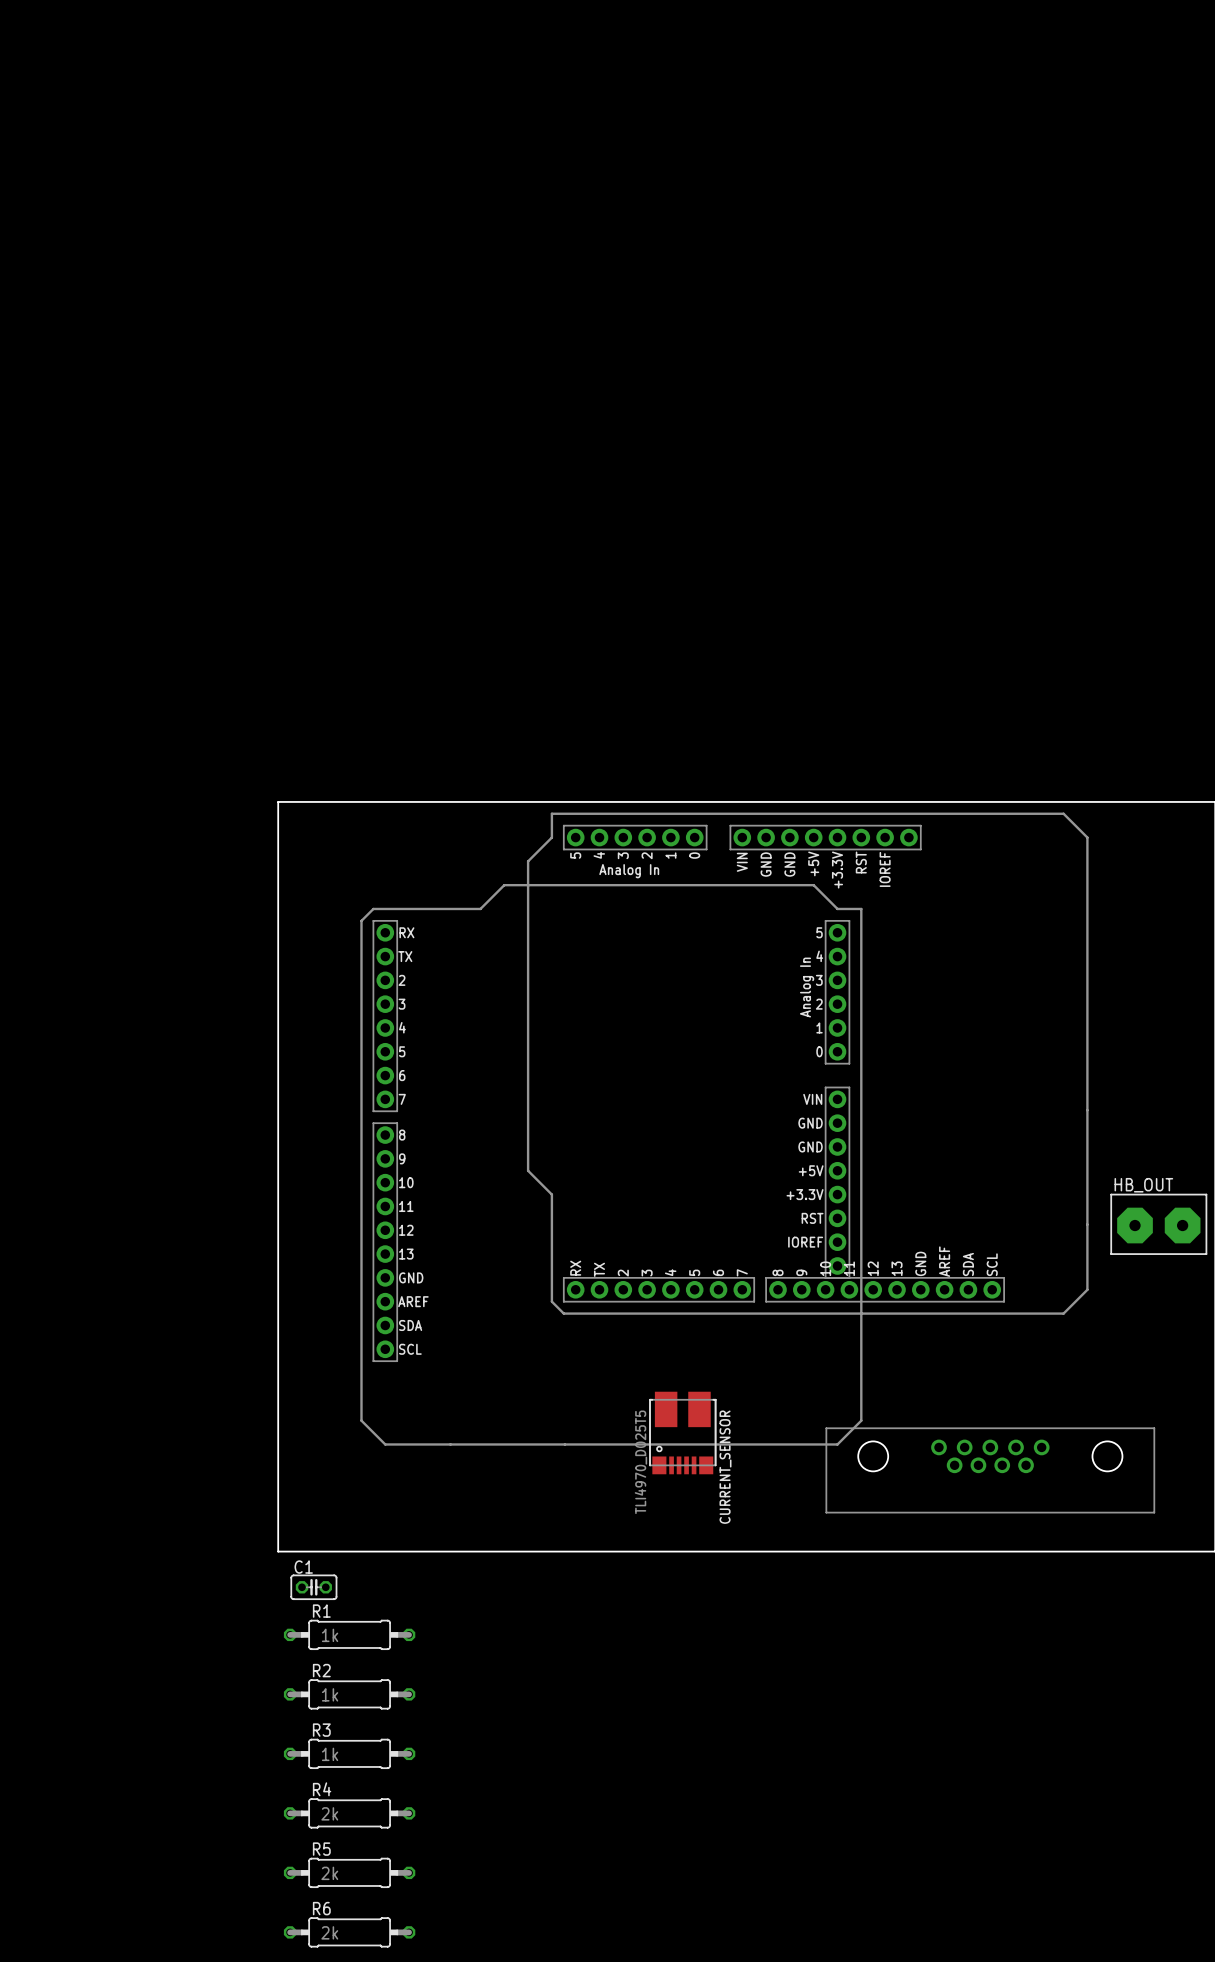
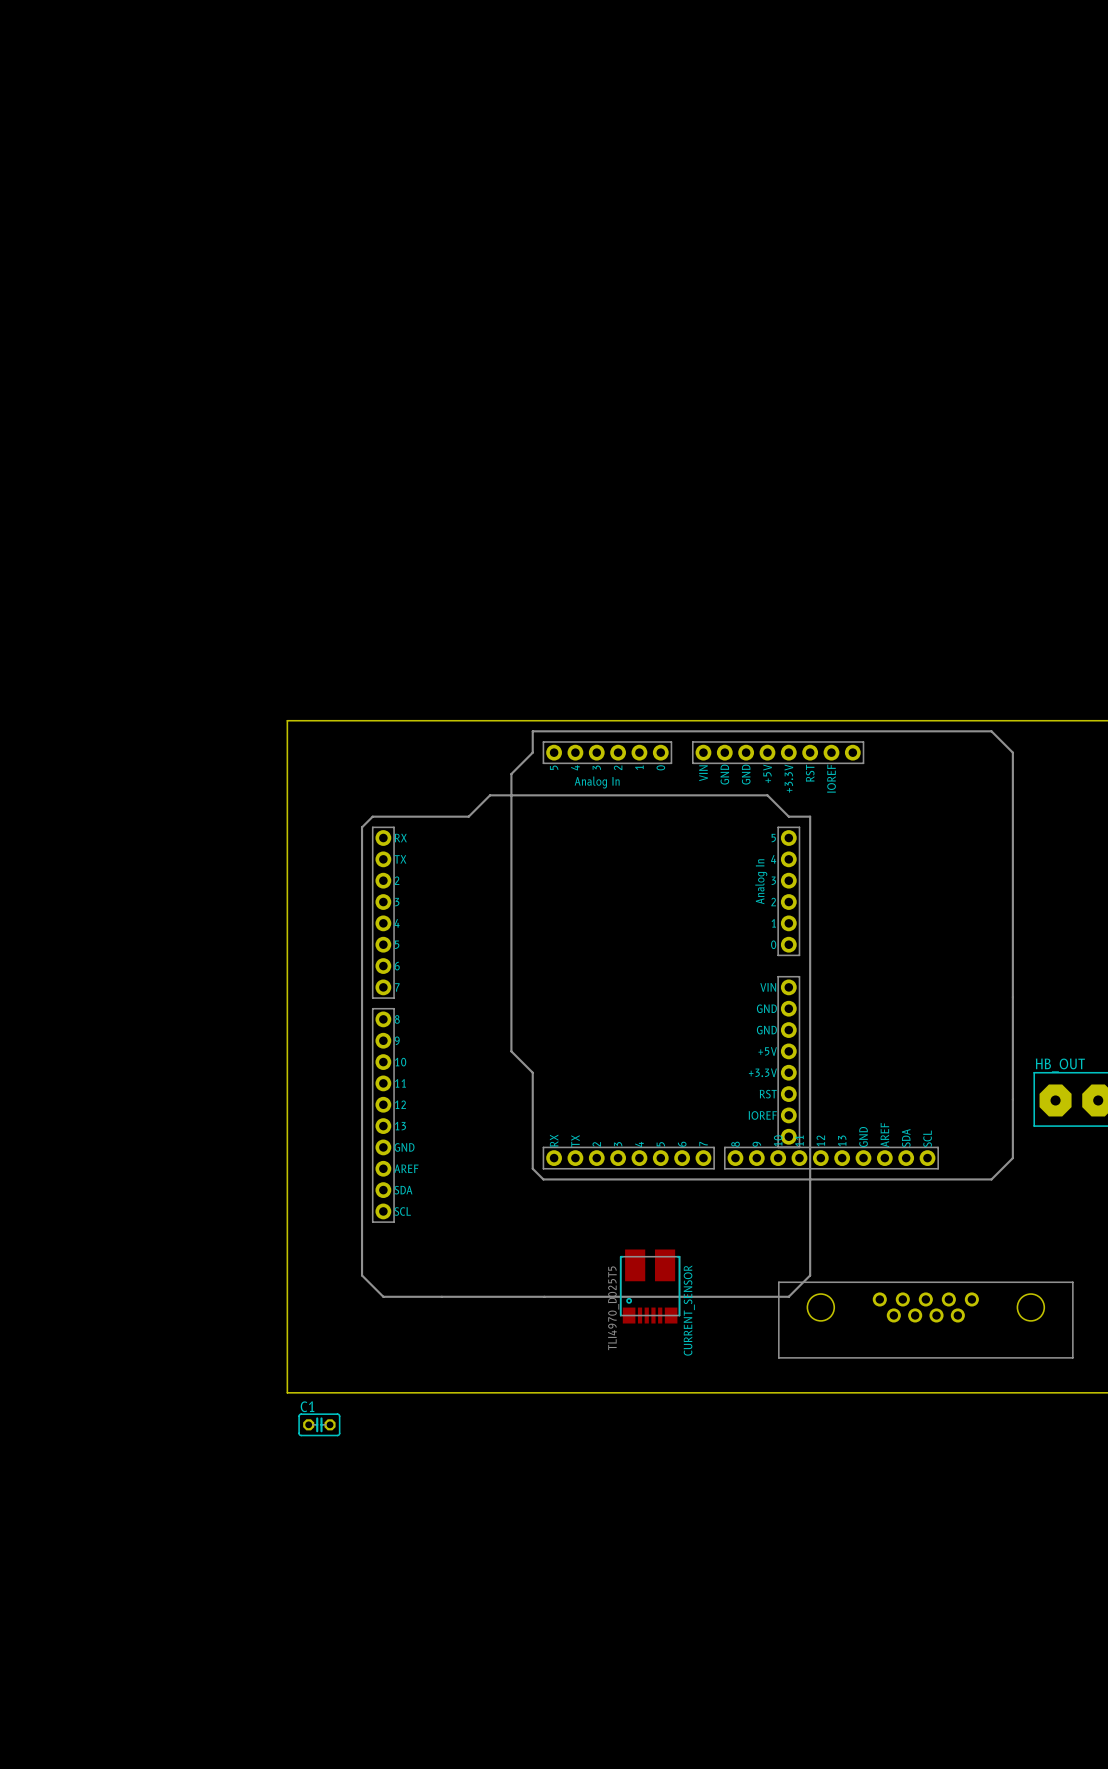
R1: 1k (349, 1634) -> none
R2: 1k (349, 1694) -> none
R3: 1k (349, 1753) -> none
R4: 2k (349, 1813) -> none
R5: 2k (349, 1872) -> none
R6: 2k (349, 1932) -> none

